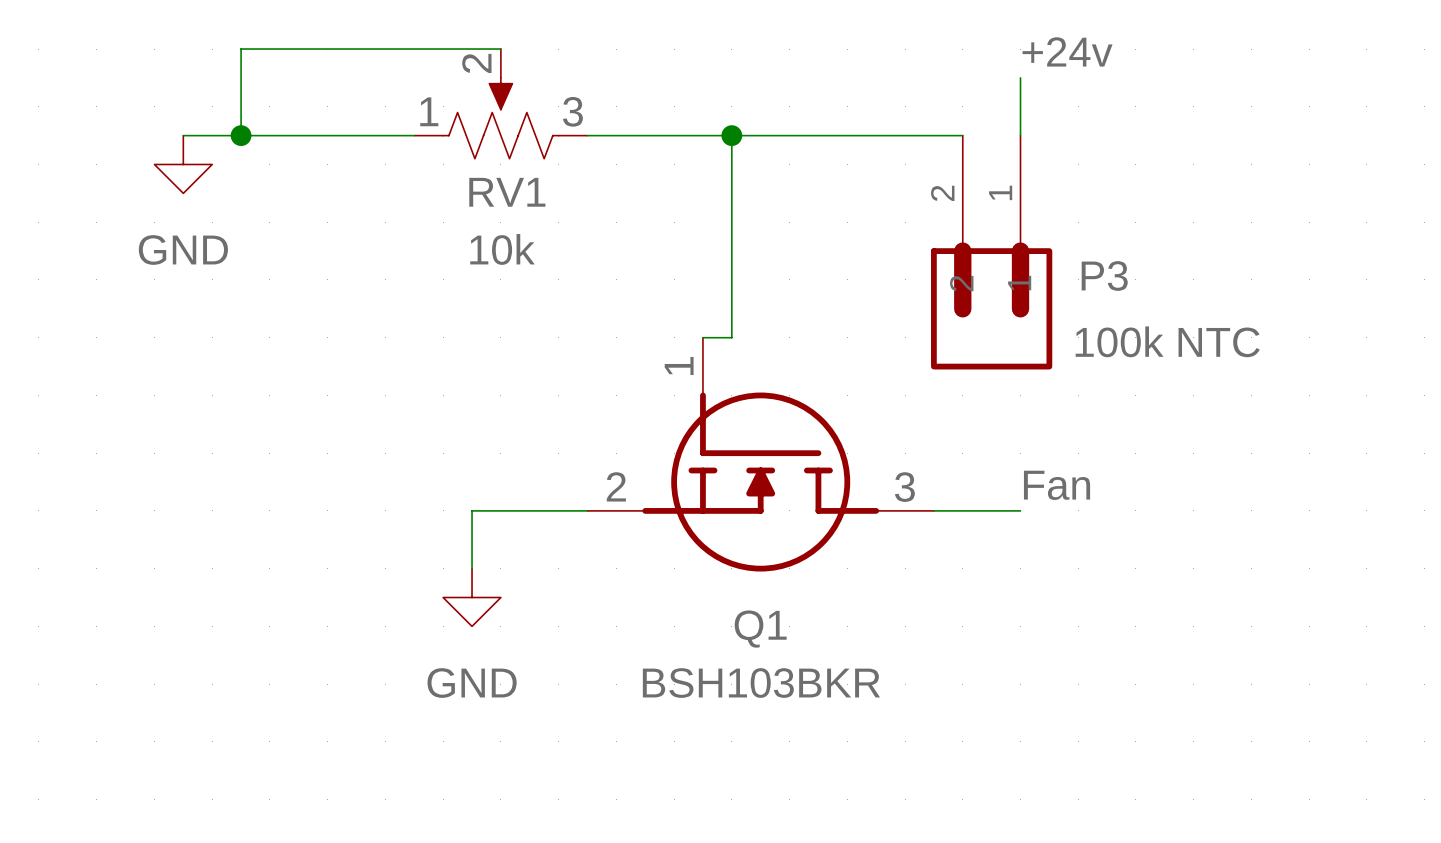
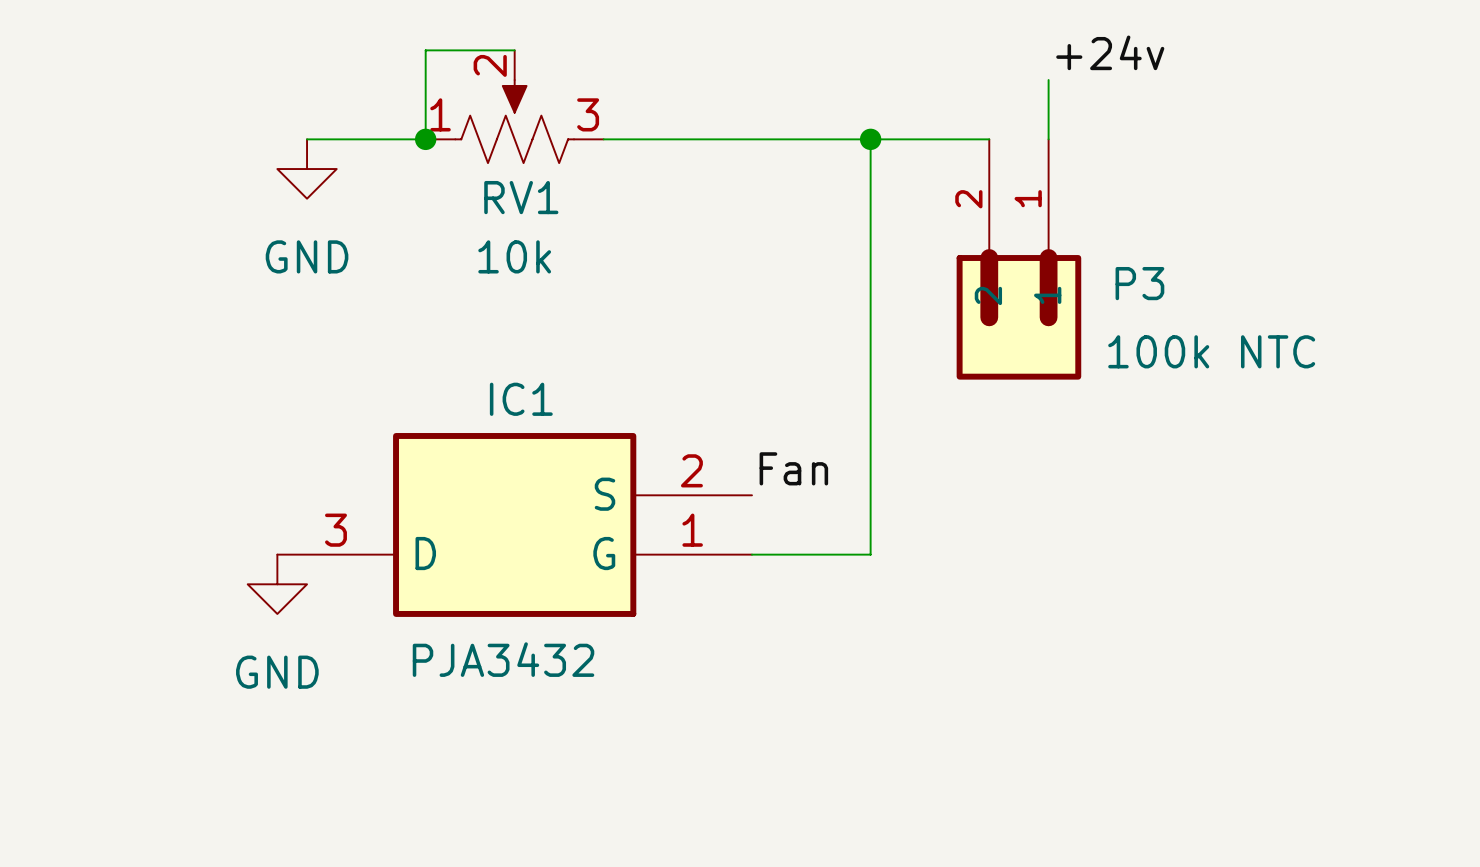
wire: (414, 49) (241, 49) (241, 135) -> (425, 50) (425, 139)
wire: (183, 135) (298, 135) -> none
junction: (241, 135) -> none
junction: none -> (425, 139)
wire: (731, 135) (731, 337) (702, 337) -> none
junction position: (731, 135) -> (870, 139)
wire: none -> (870, 139) (870, 554) (751, 554)
power symbol position: GND (183, 164) -> GND (307, 169)
Q1: BSH103BKR (760, 454) -> none
label position: Fan (1057, 485) -> Fan (793, 468)
IC1: none -> PJA3432 (514, 524)
wire: (933, 510) (1020, 510) -> none
power symbol position: GND (472, 597) -> GND (277, 584)

